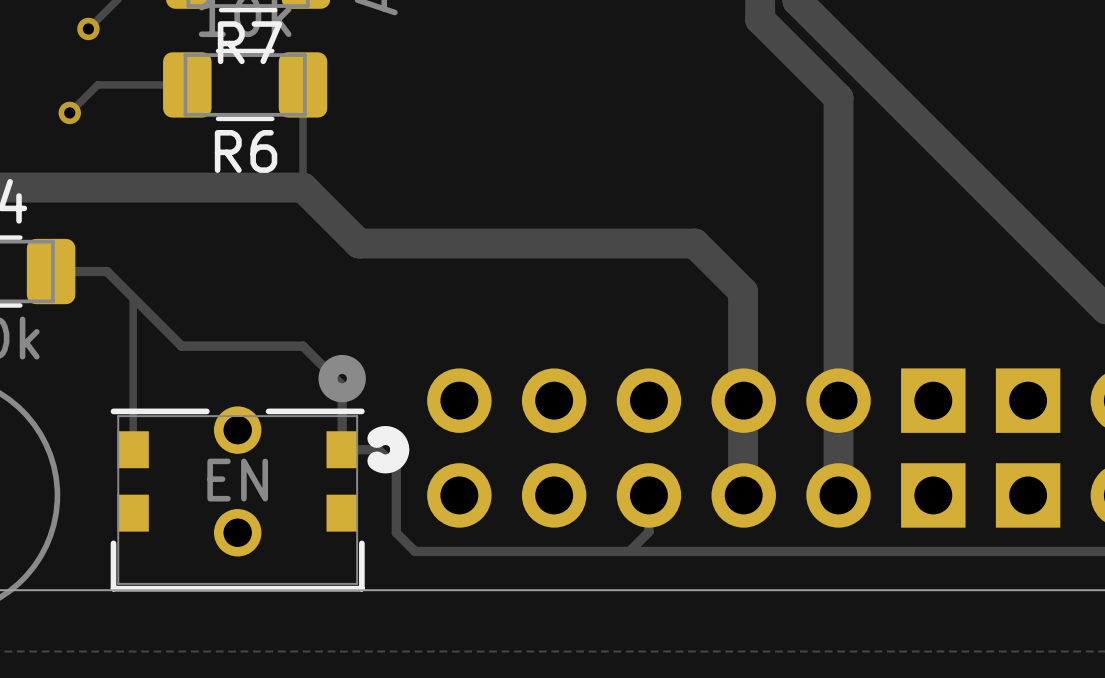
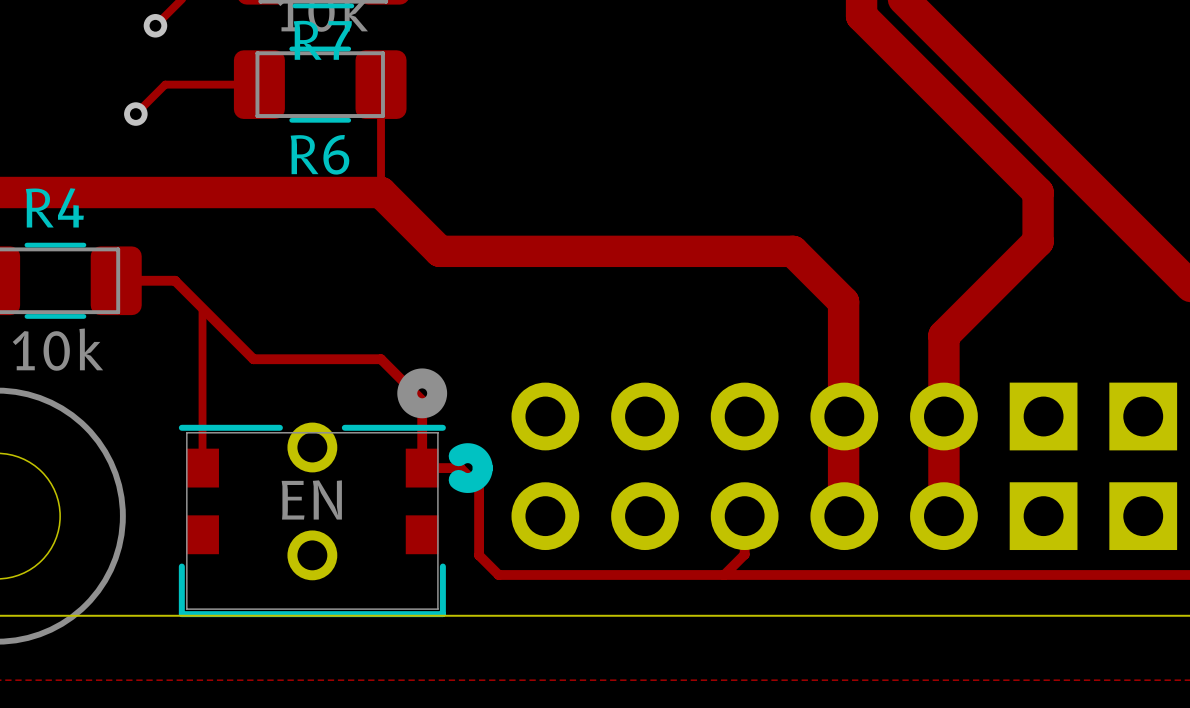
track: (838, 97) (838, 323) -> (943, 98) (1038, 192) (1038, 241) (943, 335)

